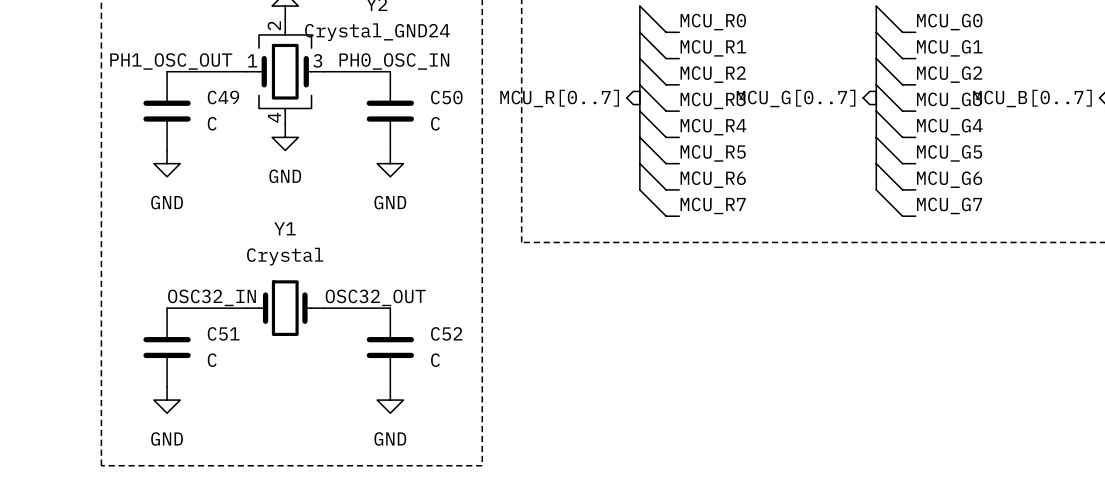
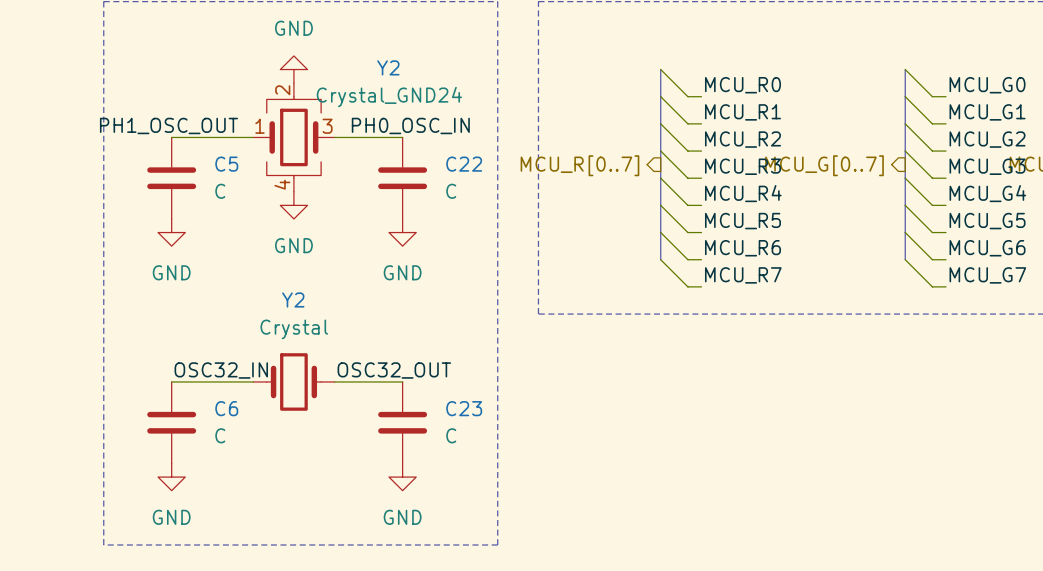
C49 name: C49 (223, 97) -> C5 (226, 164)
C50 name: C50 (446, 97) -> C22 (464, 164)
Y1 name: Y1 (284, 228) -> Y2 (293, 299)
C51 name: C51 (223, 333) -> C6 (226, 408)
C52 name: C52 (446, 333) -> C23 (464, 408)

